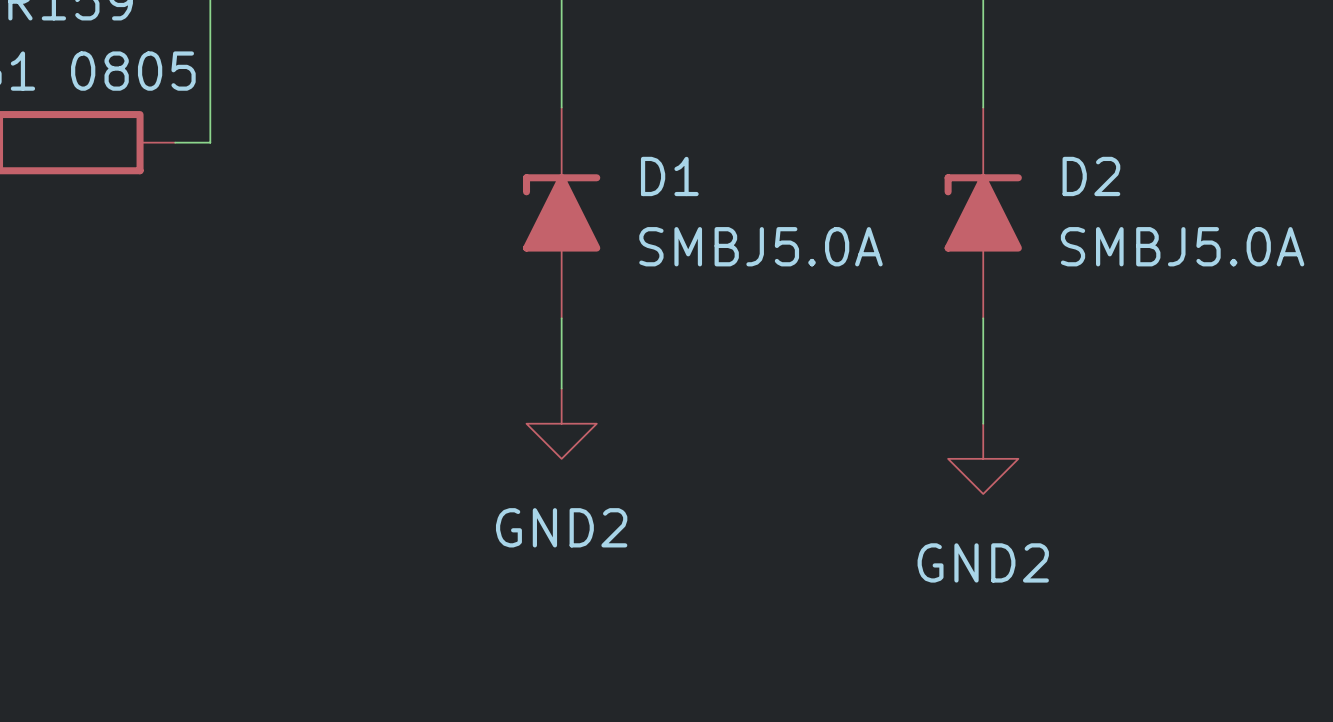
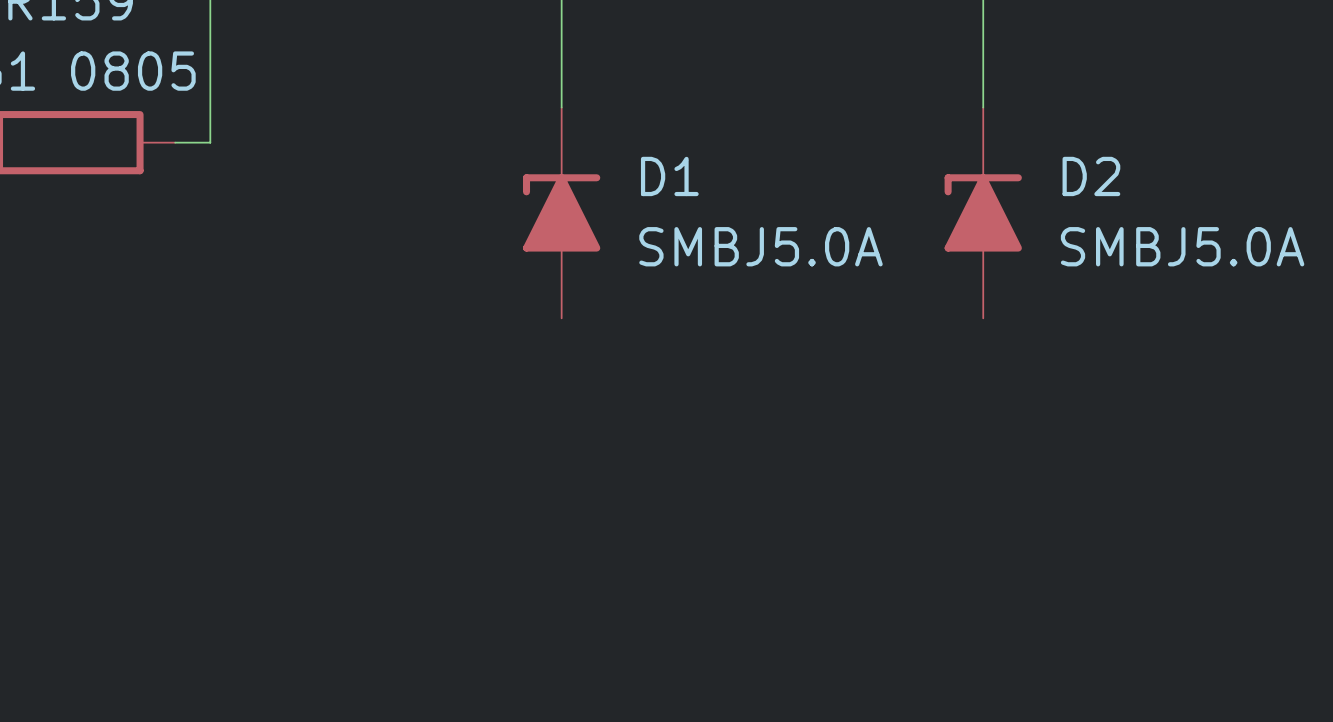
wire: (561, 318) (561, 388) -> none
wire: (983, 318) (983, 423) -> none
power symbol: GND2 (561, 423) -> none
power symbol: GND2 (983, 458) -> none

